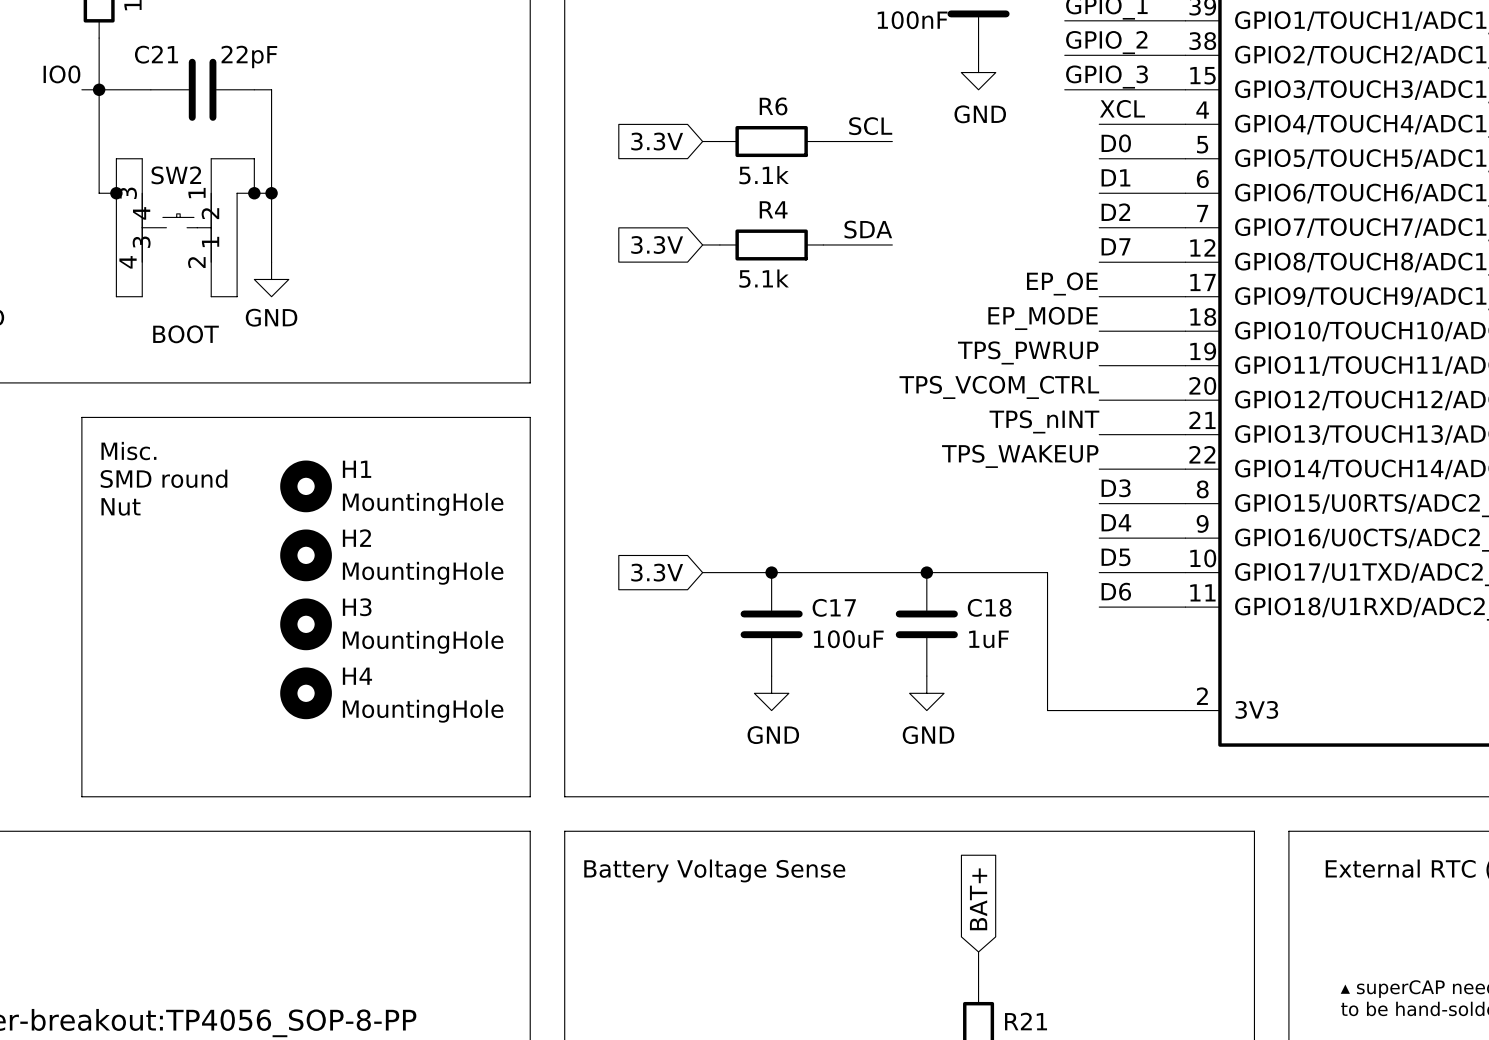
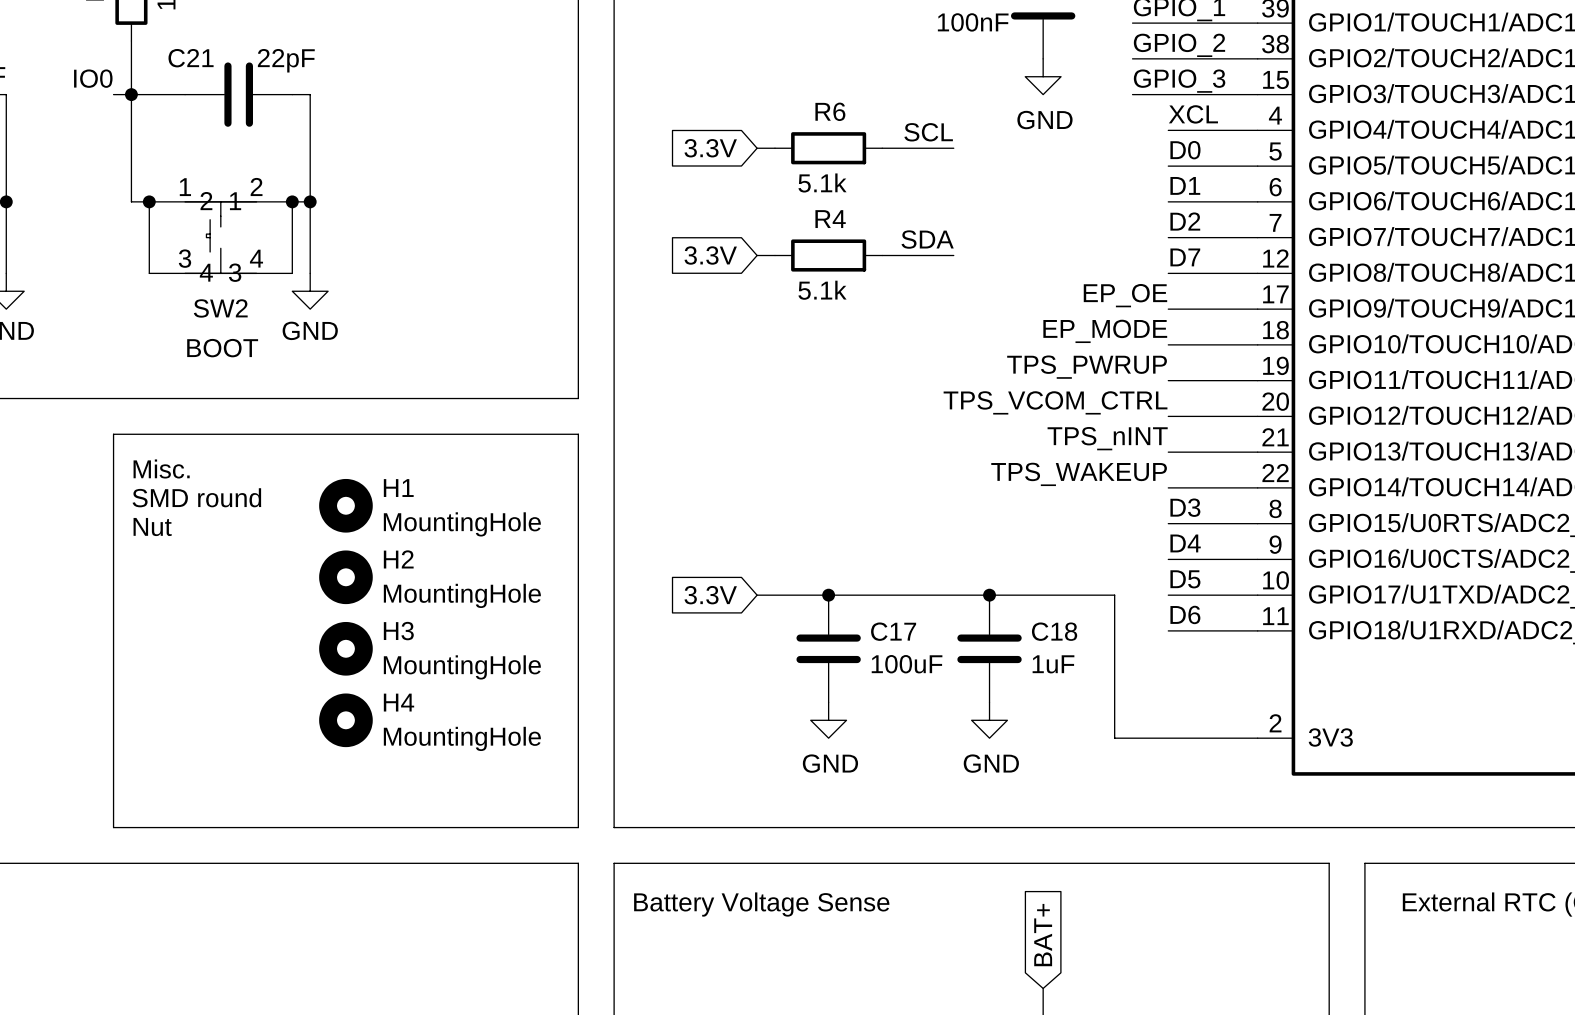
wire: (142, 158) (116, 158) (116, 193) -> none
wire: (211, 158) (254, 158) (254, 193) (237, 193) (237, 296) (211, 296) -> none
SW2 name position: SW2 (176, 175) -> SW2 (220, 308)
wire: none -> (292, 201) (292, 273)
SW2 rotation: 0° (176, 227) -> 90° counterclockwise (220, 237)
wire: (116, 262) (116, 296) (142, 296) -> none

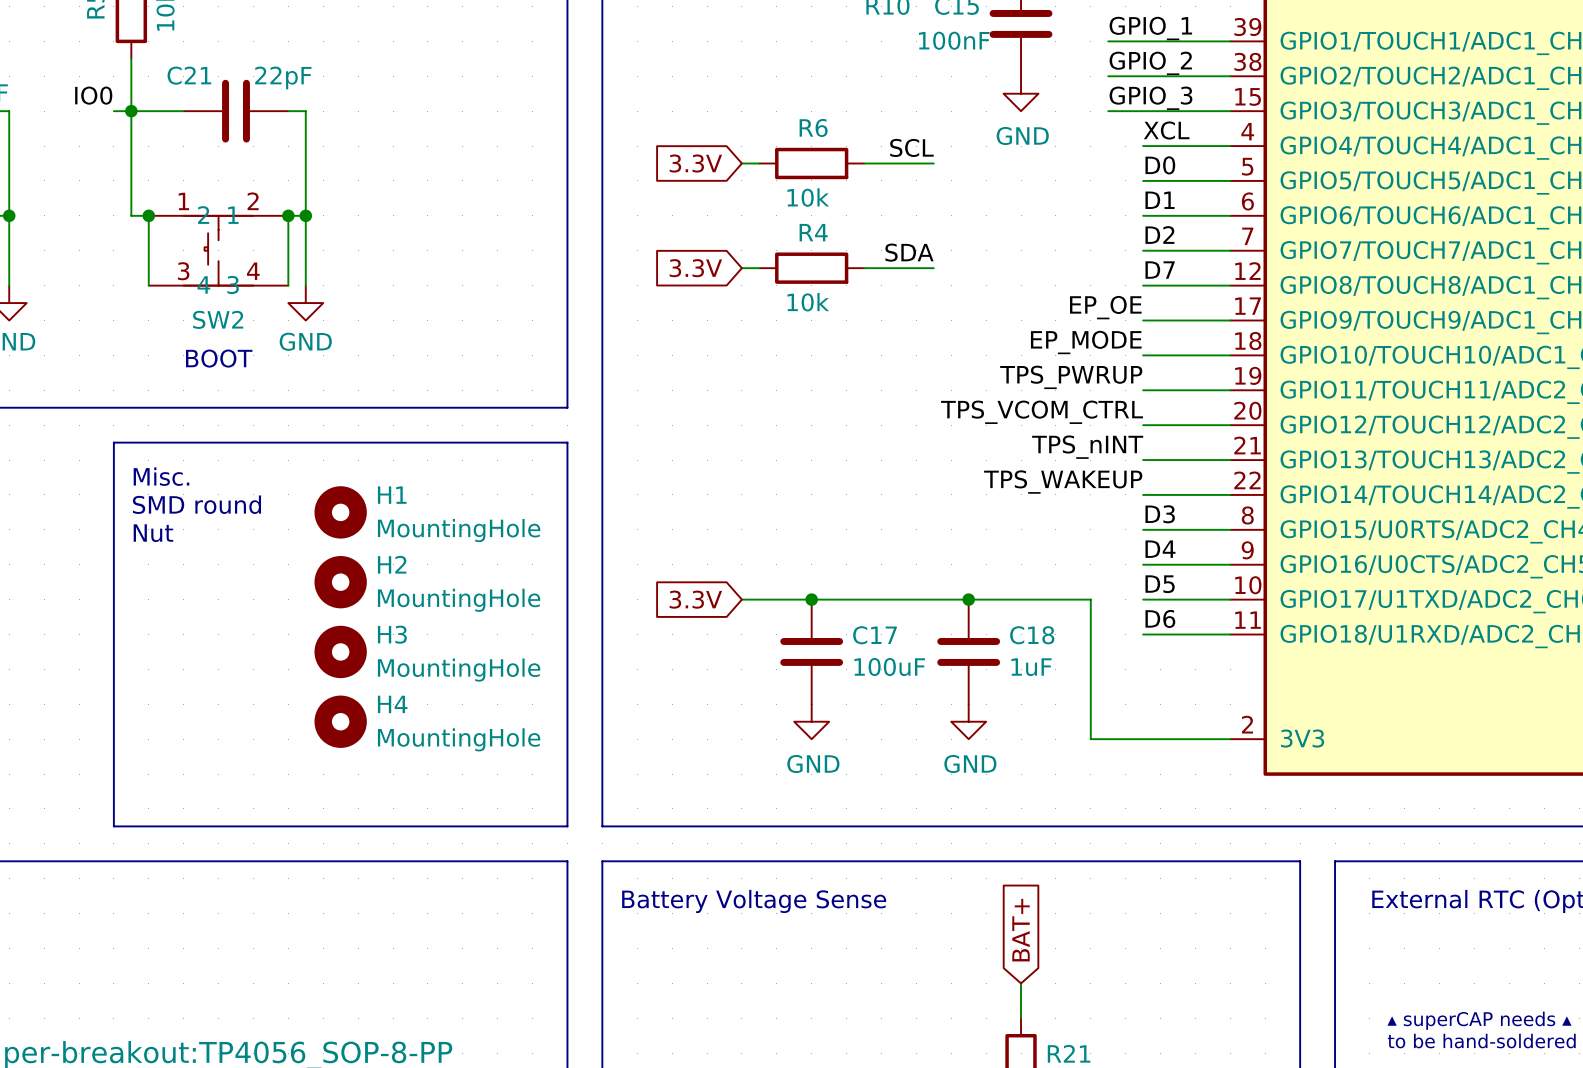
R6 value: 5.1k (822, 182) -> 10k (808, 197)
R4 value: 5.1k (822, 290) -> 10k (808, 302)

